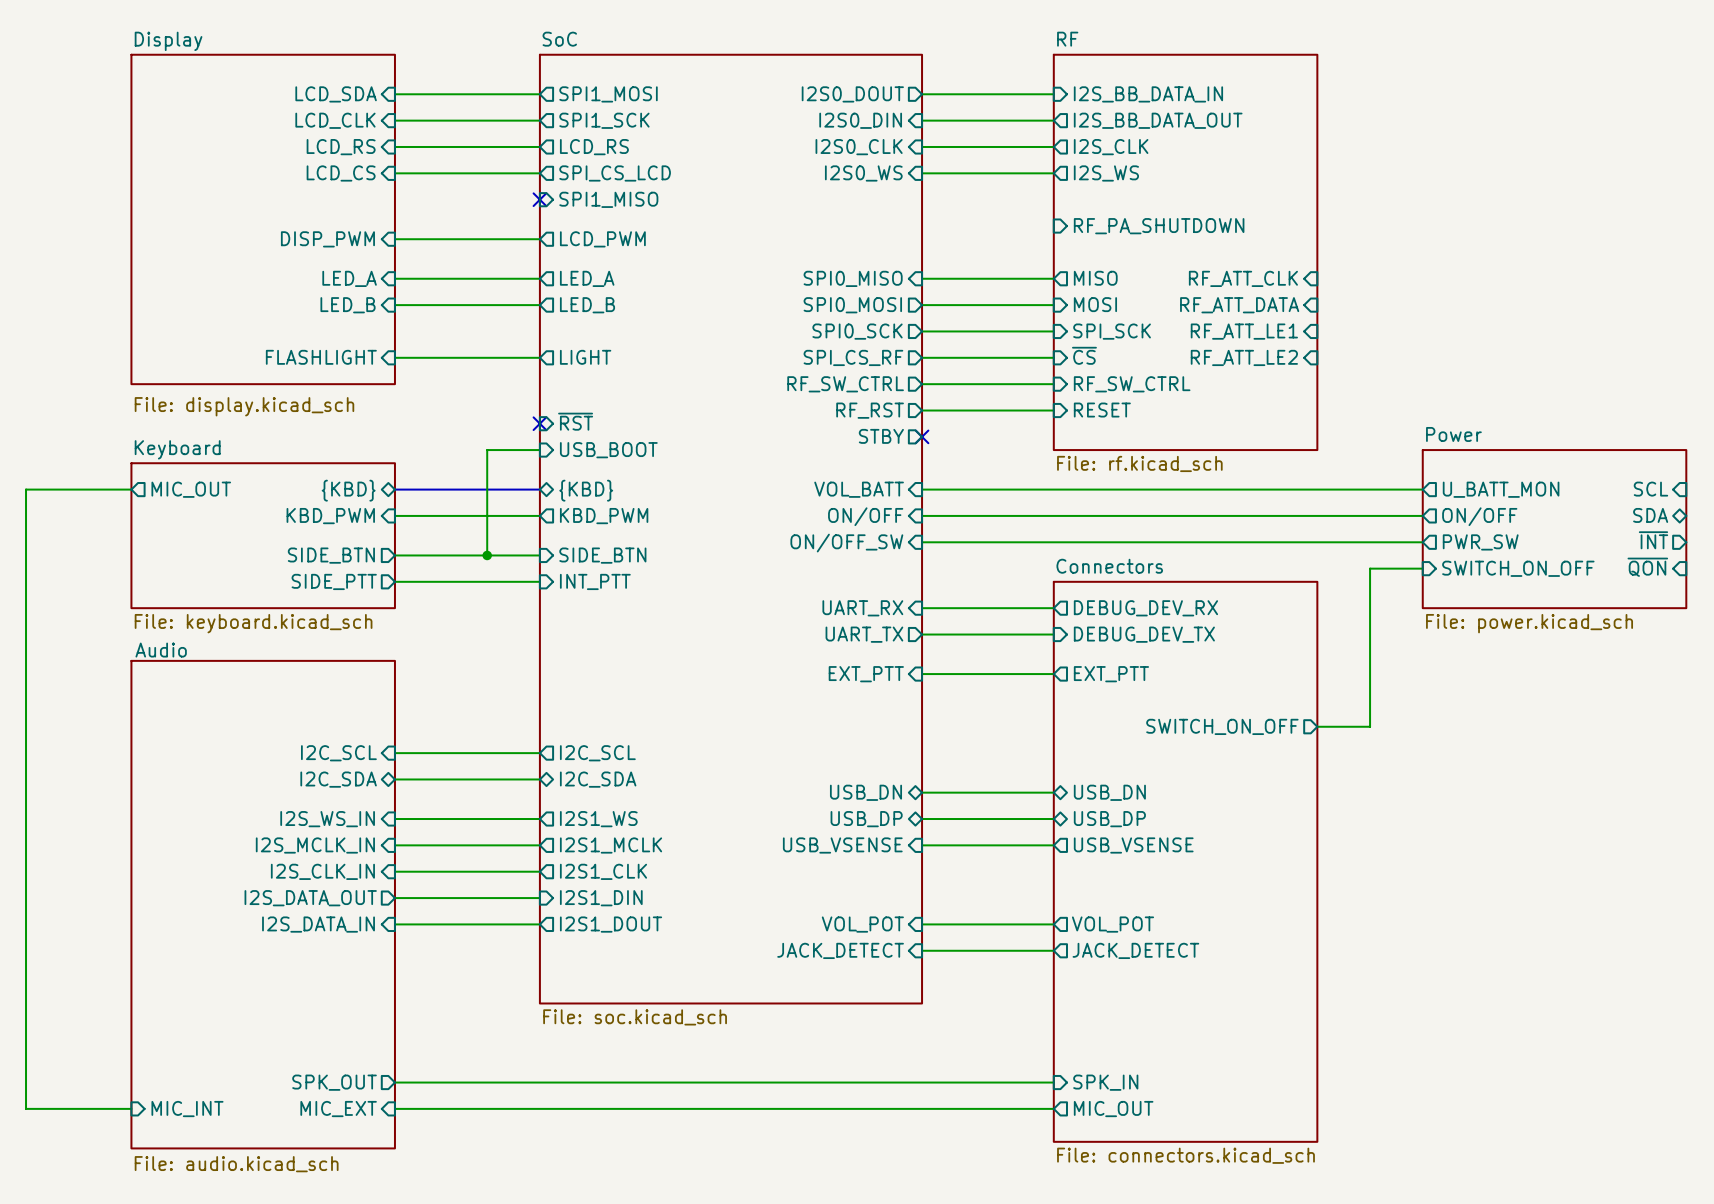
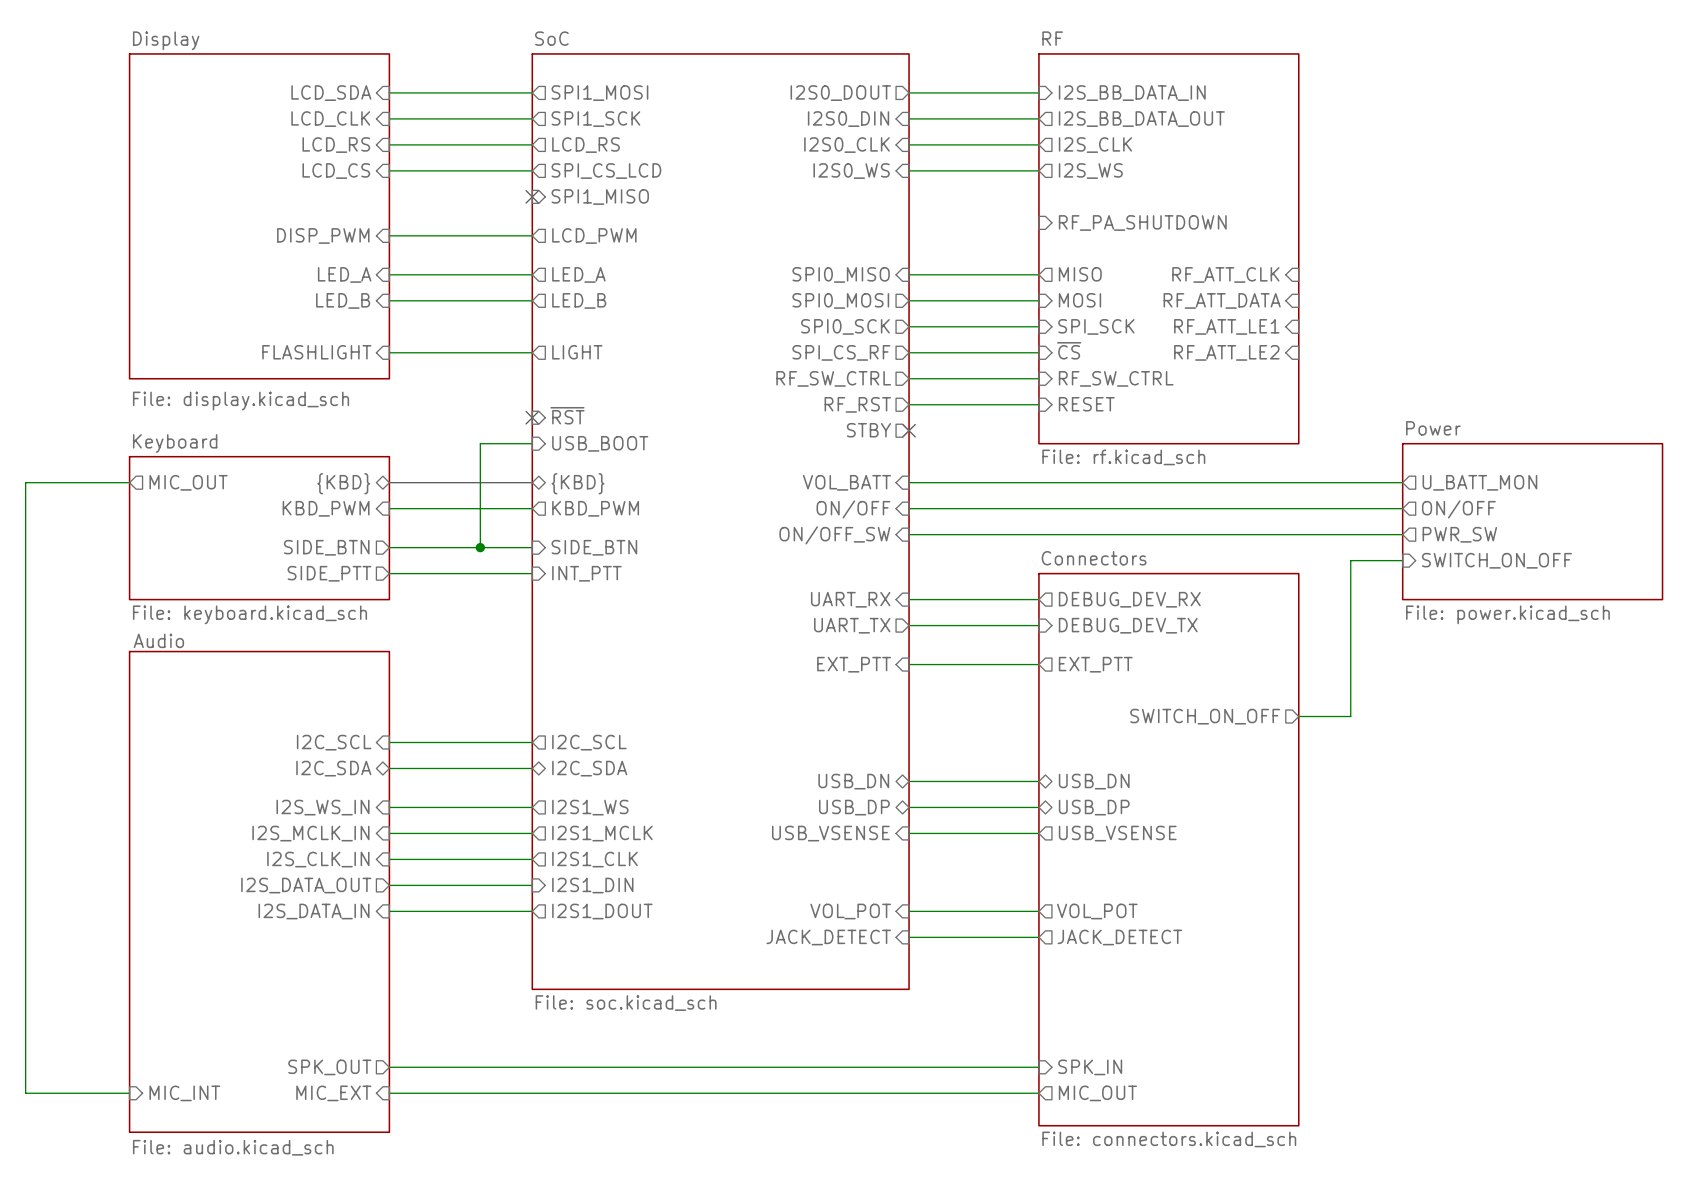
sheet pin: SCL (1650, 489) -> none
sheet pin: SDA (1650, 515) -> none
sheet pin: ~{INT} (1653, 540) -> none
sheet pin: ~{QON} (1647, 567) -> none

